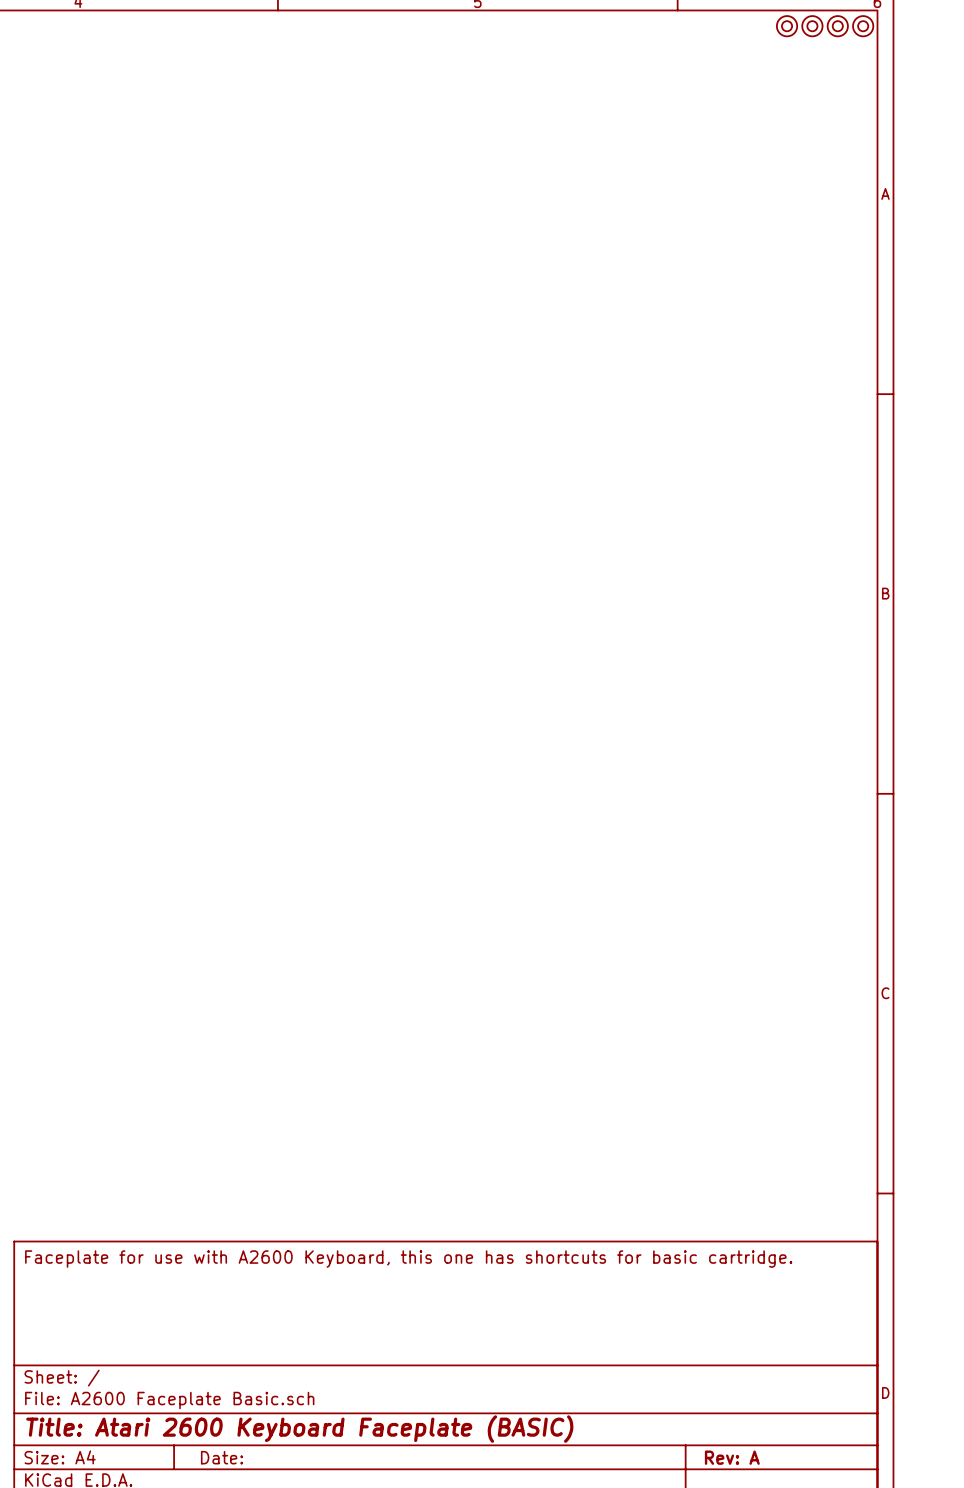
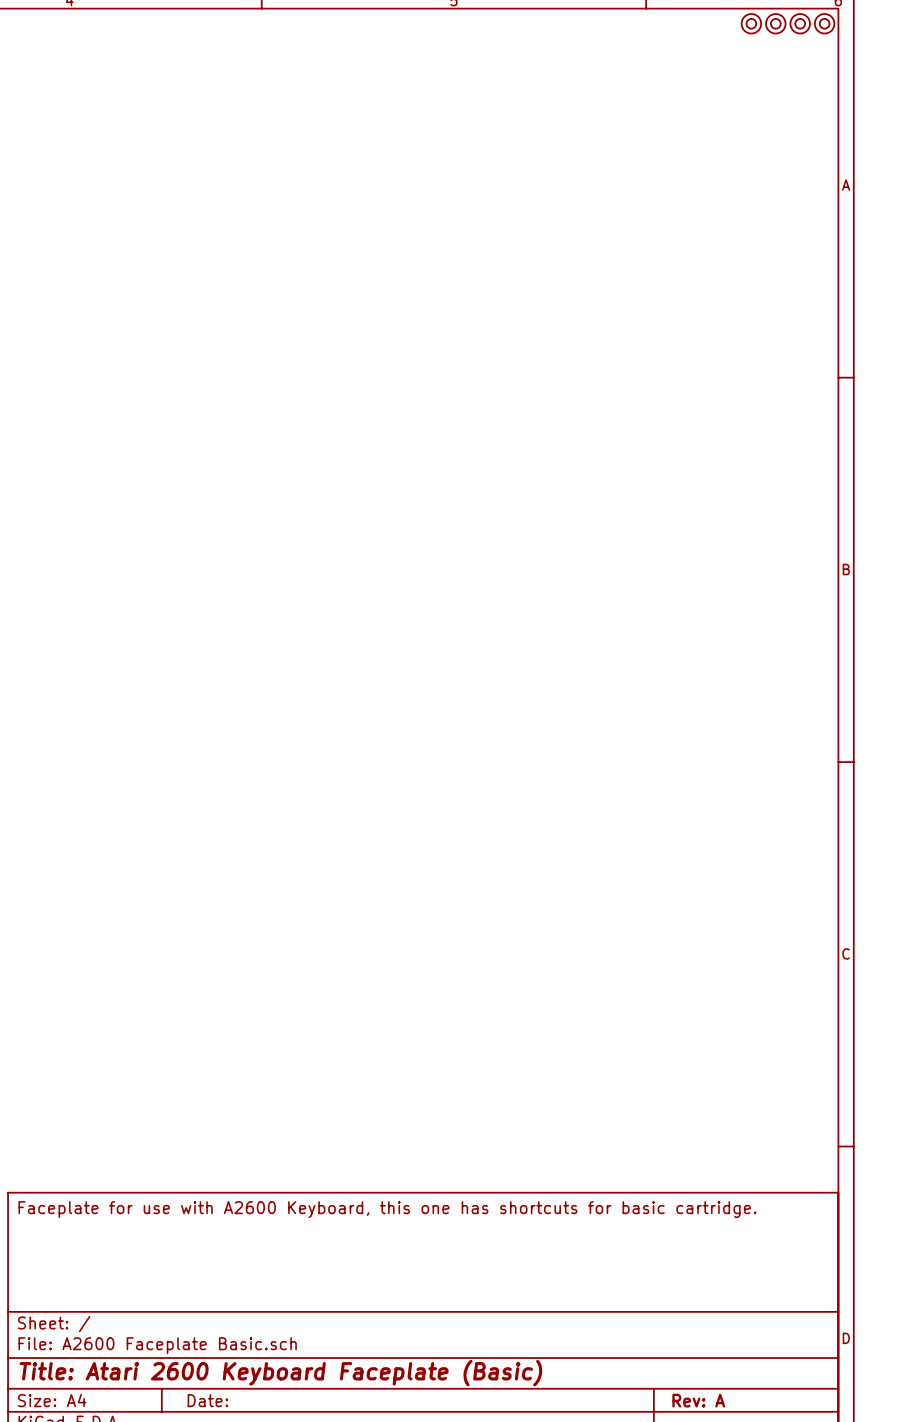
title block: Title: Atari 2600 Keyboard Faceplate (BASIC) (299, 1429) -> Title: Atari 2600 Keyboard Faceplate (Basic) (280, 1373)

